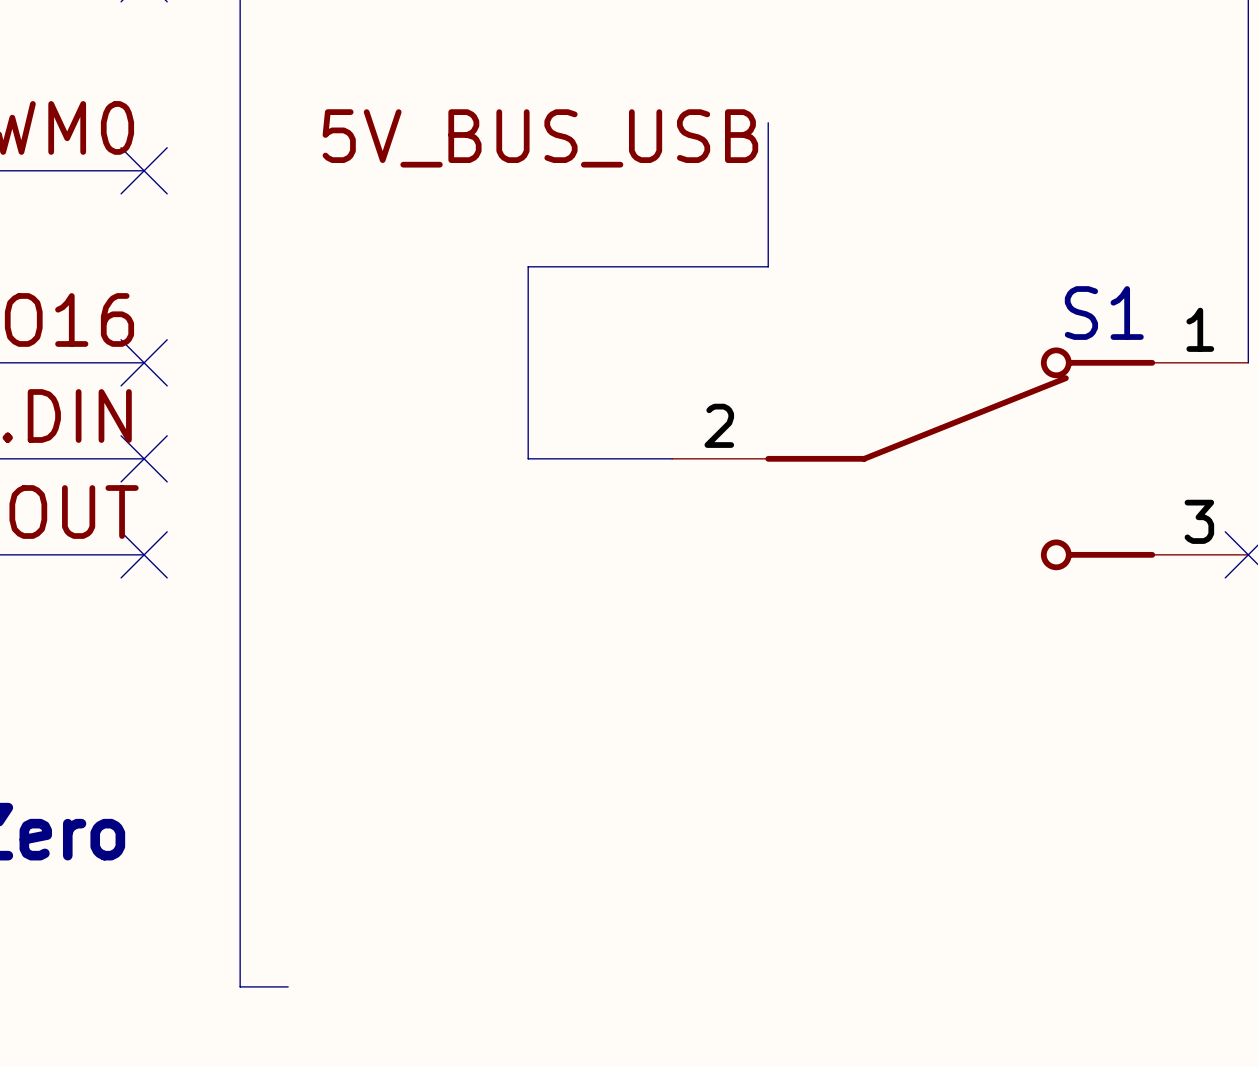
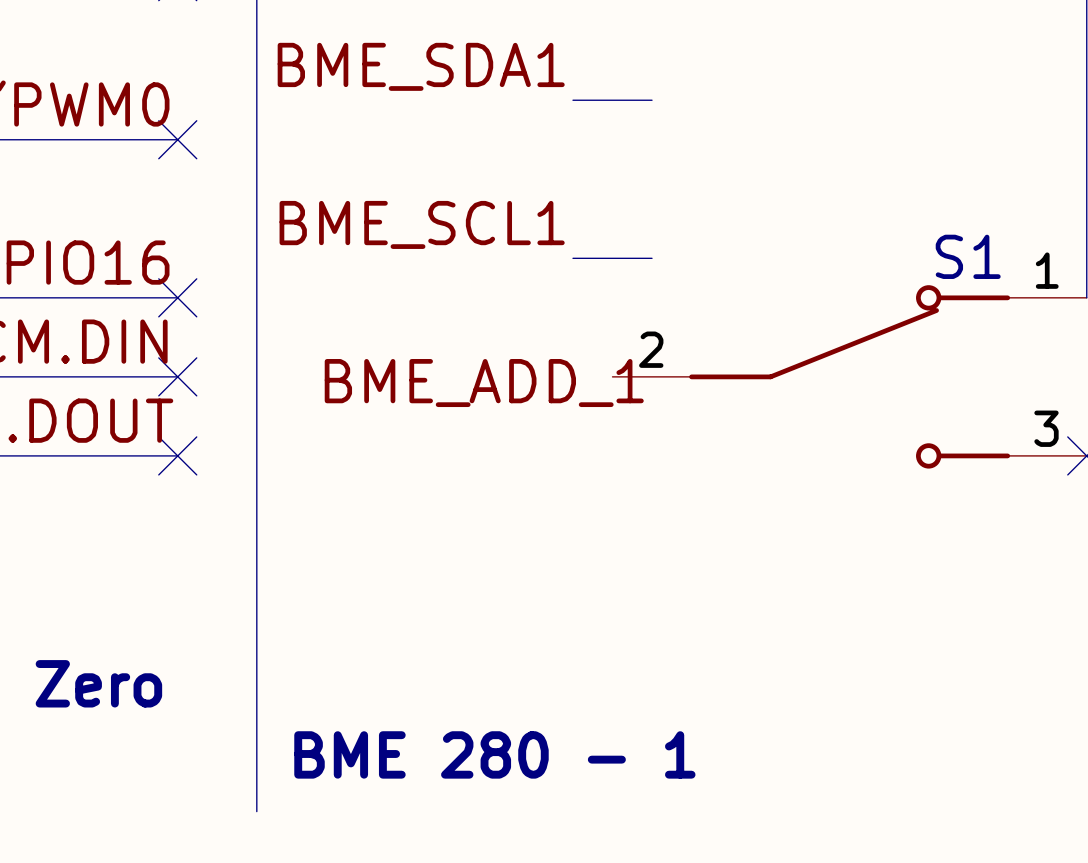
label: none -> BME_SDA1 (421, 66)
wire: none -> (572, 100) (652, 100)
wire: (768, 122) (768, 266) (528, 266) (528, 458) (672, 458) -> none
label: 5V_BUS_USB (540, 138) -> none
label: none -> BME_SCL1 (422, 224)
wire: none -> (572, 258) (652, 258)
label: none -> BME_ADD_1 (484, 383)
text: none -> BME 280 - 1 (494, 754)
line: (240, 986) (288, 986) -> none

